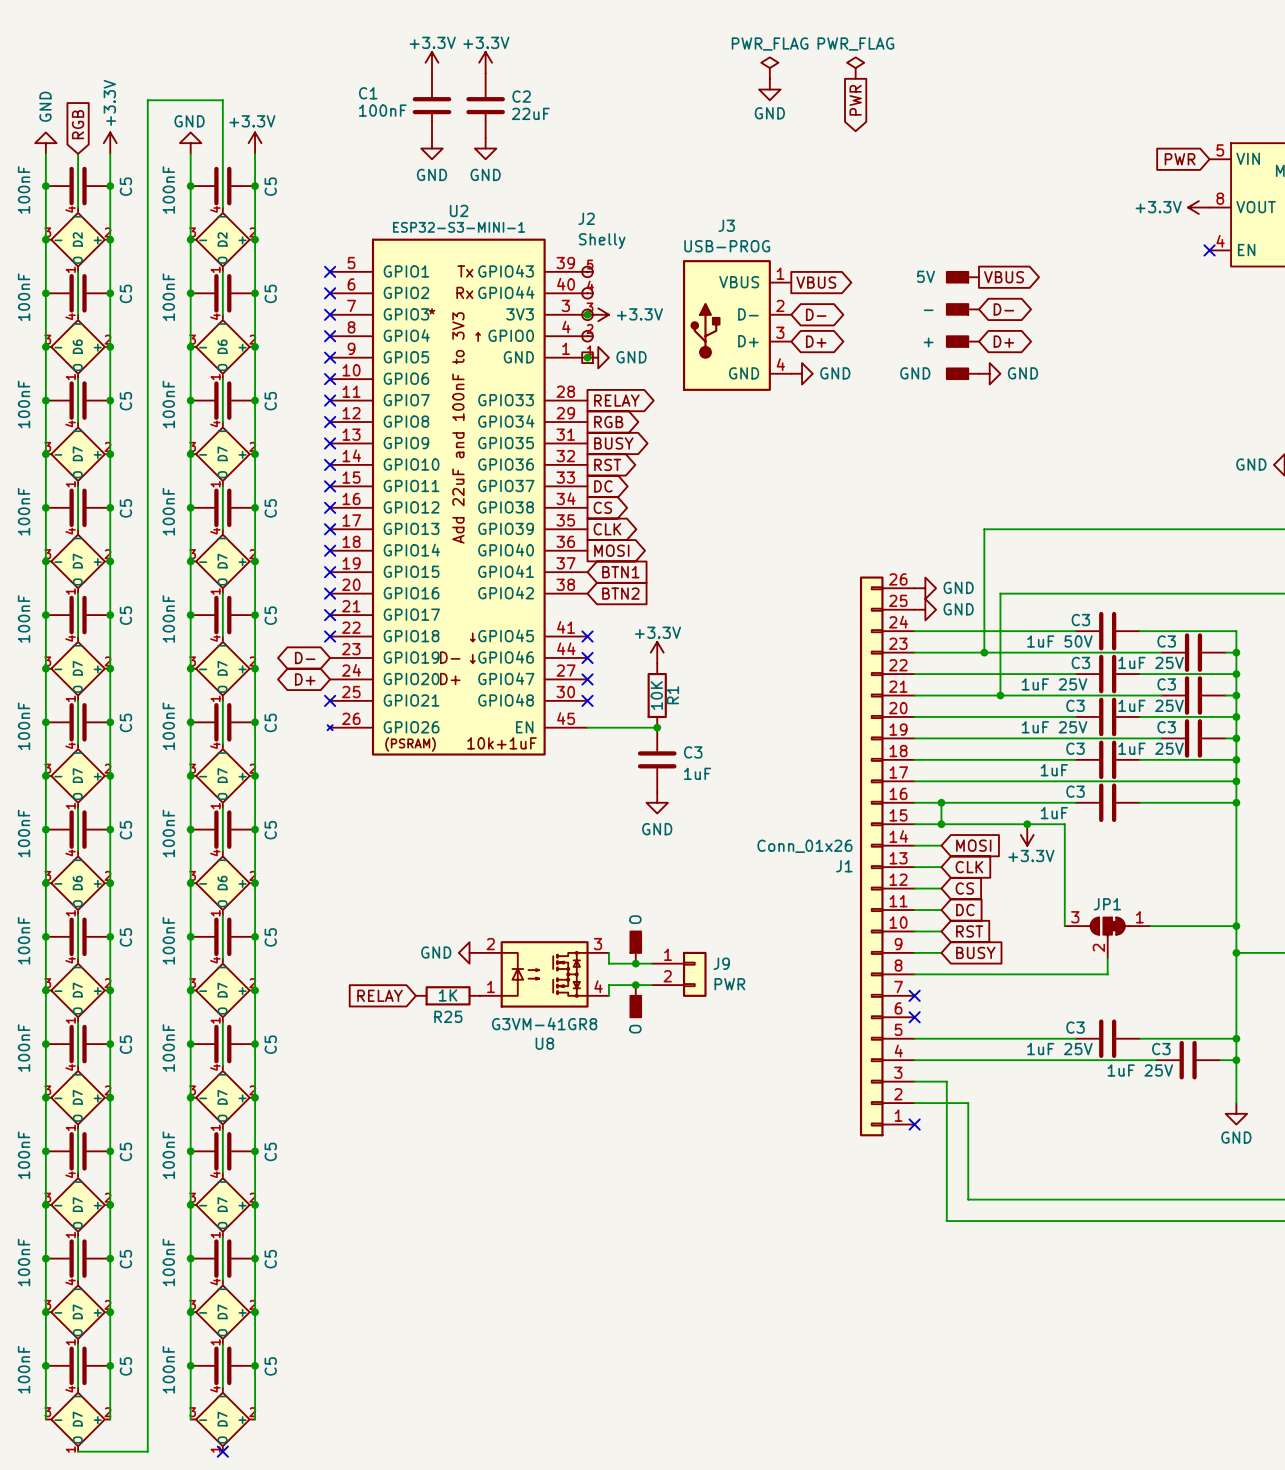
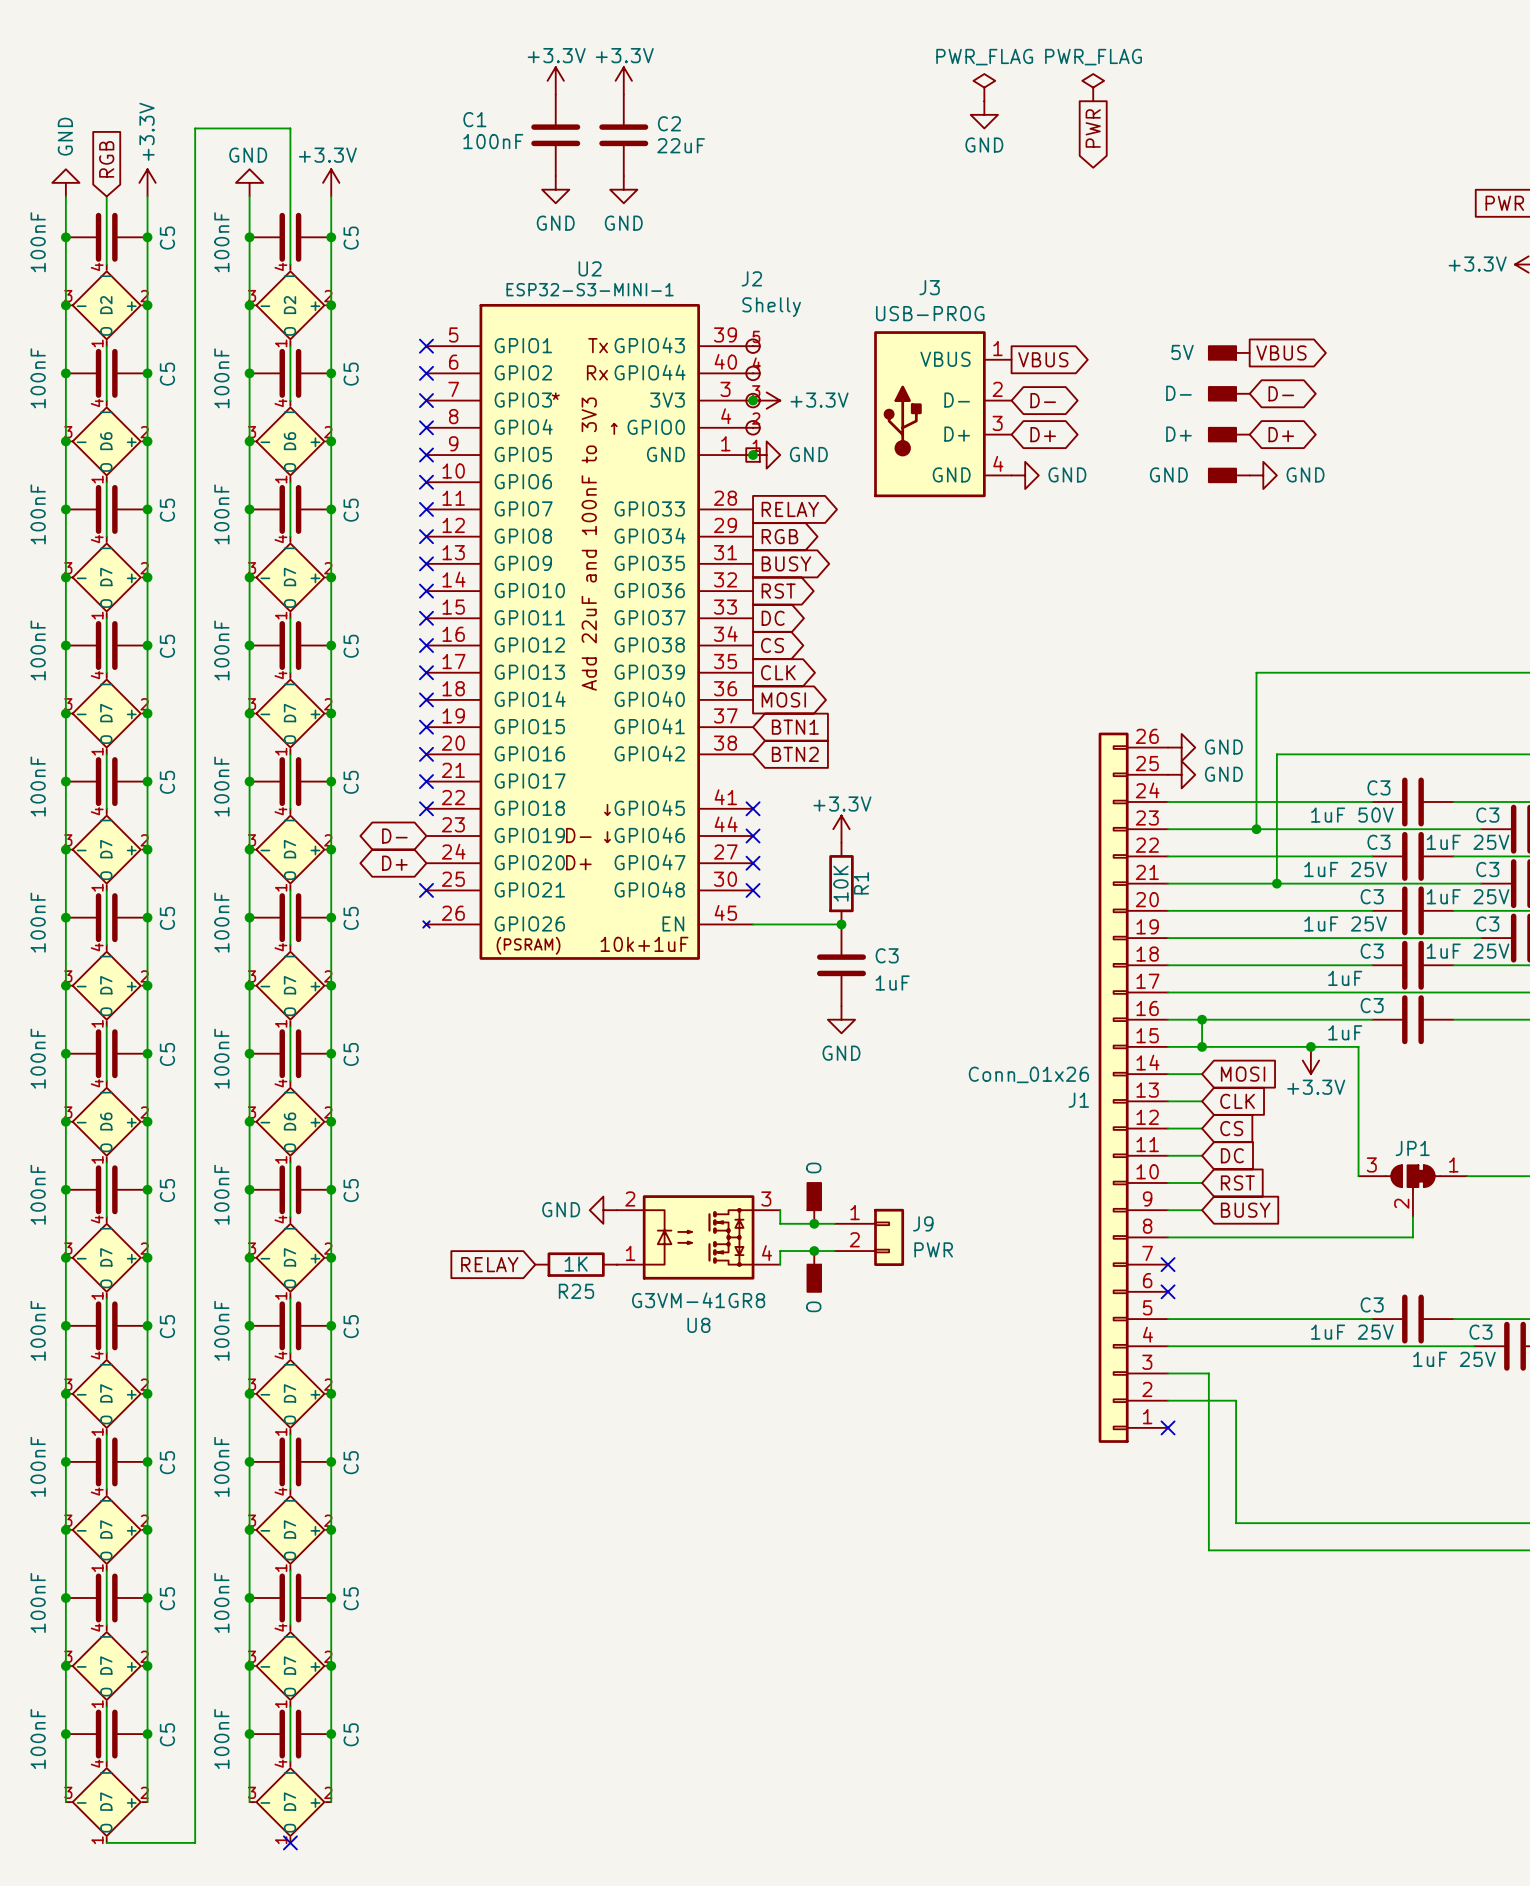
part value: - (928, 310) -> D- (1178, 393)
part value: + (928, 342) -> D+ (1178, 434)

